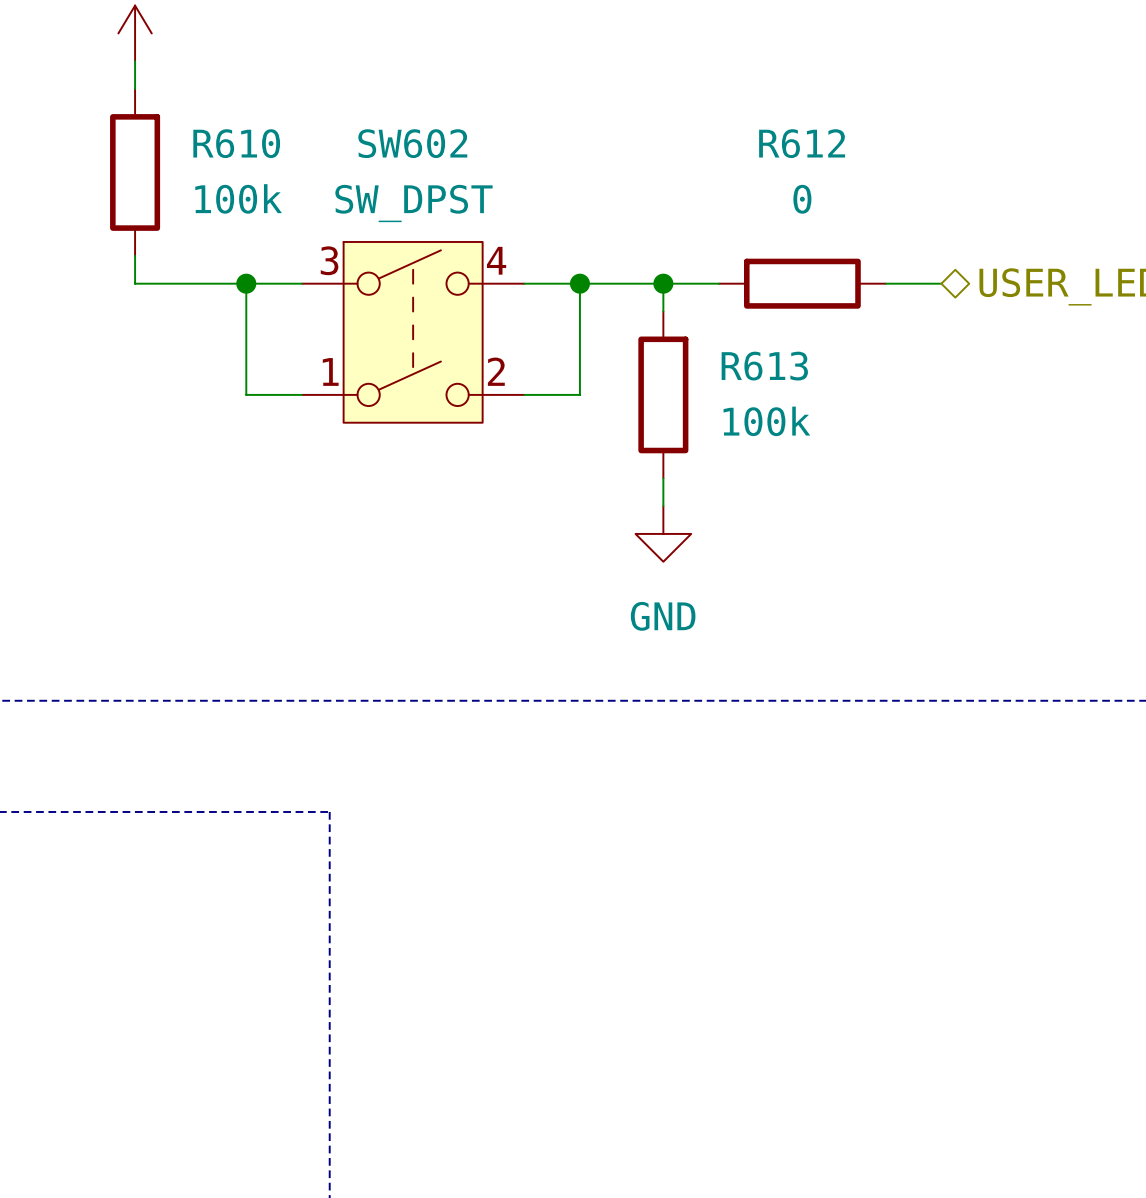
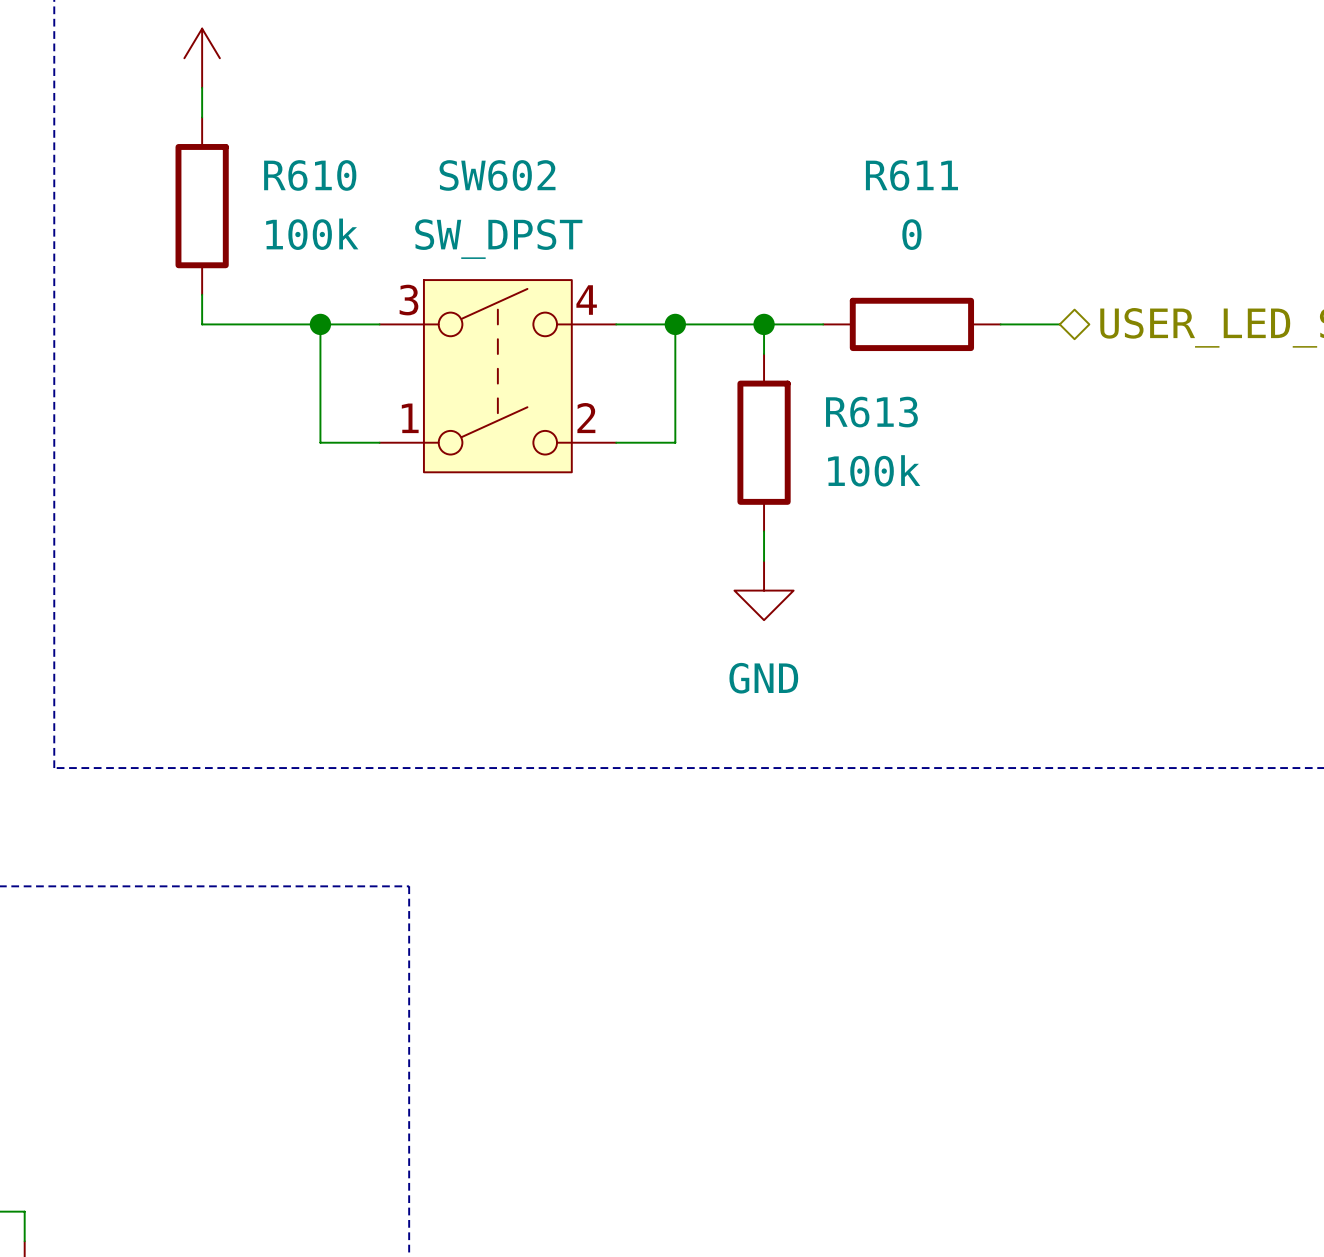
R612 name: R612 (802, 143) -> R611 (911, 175)

